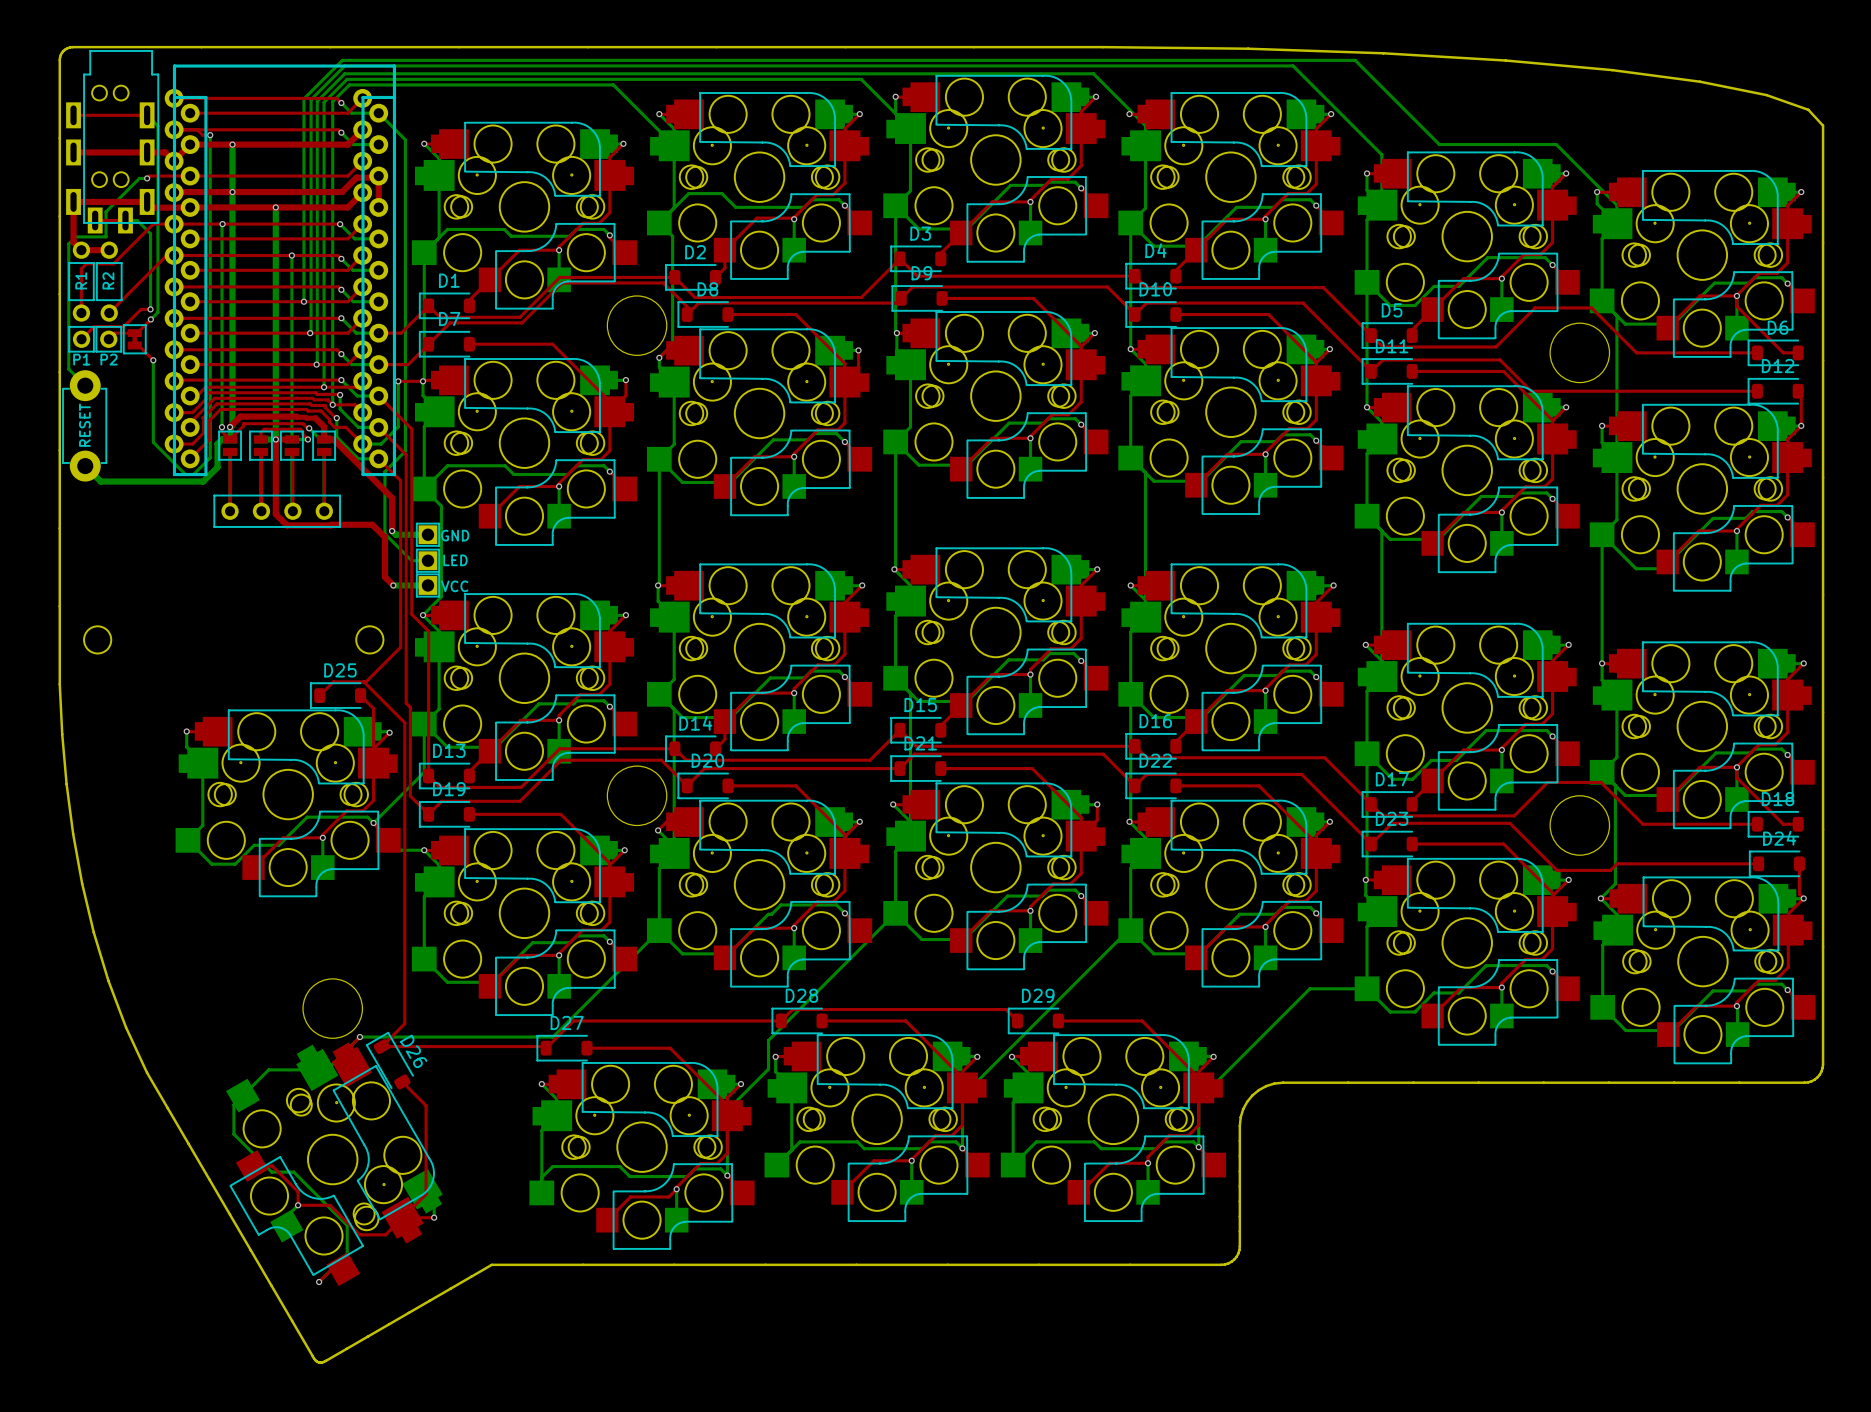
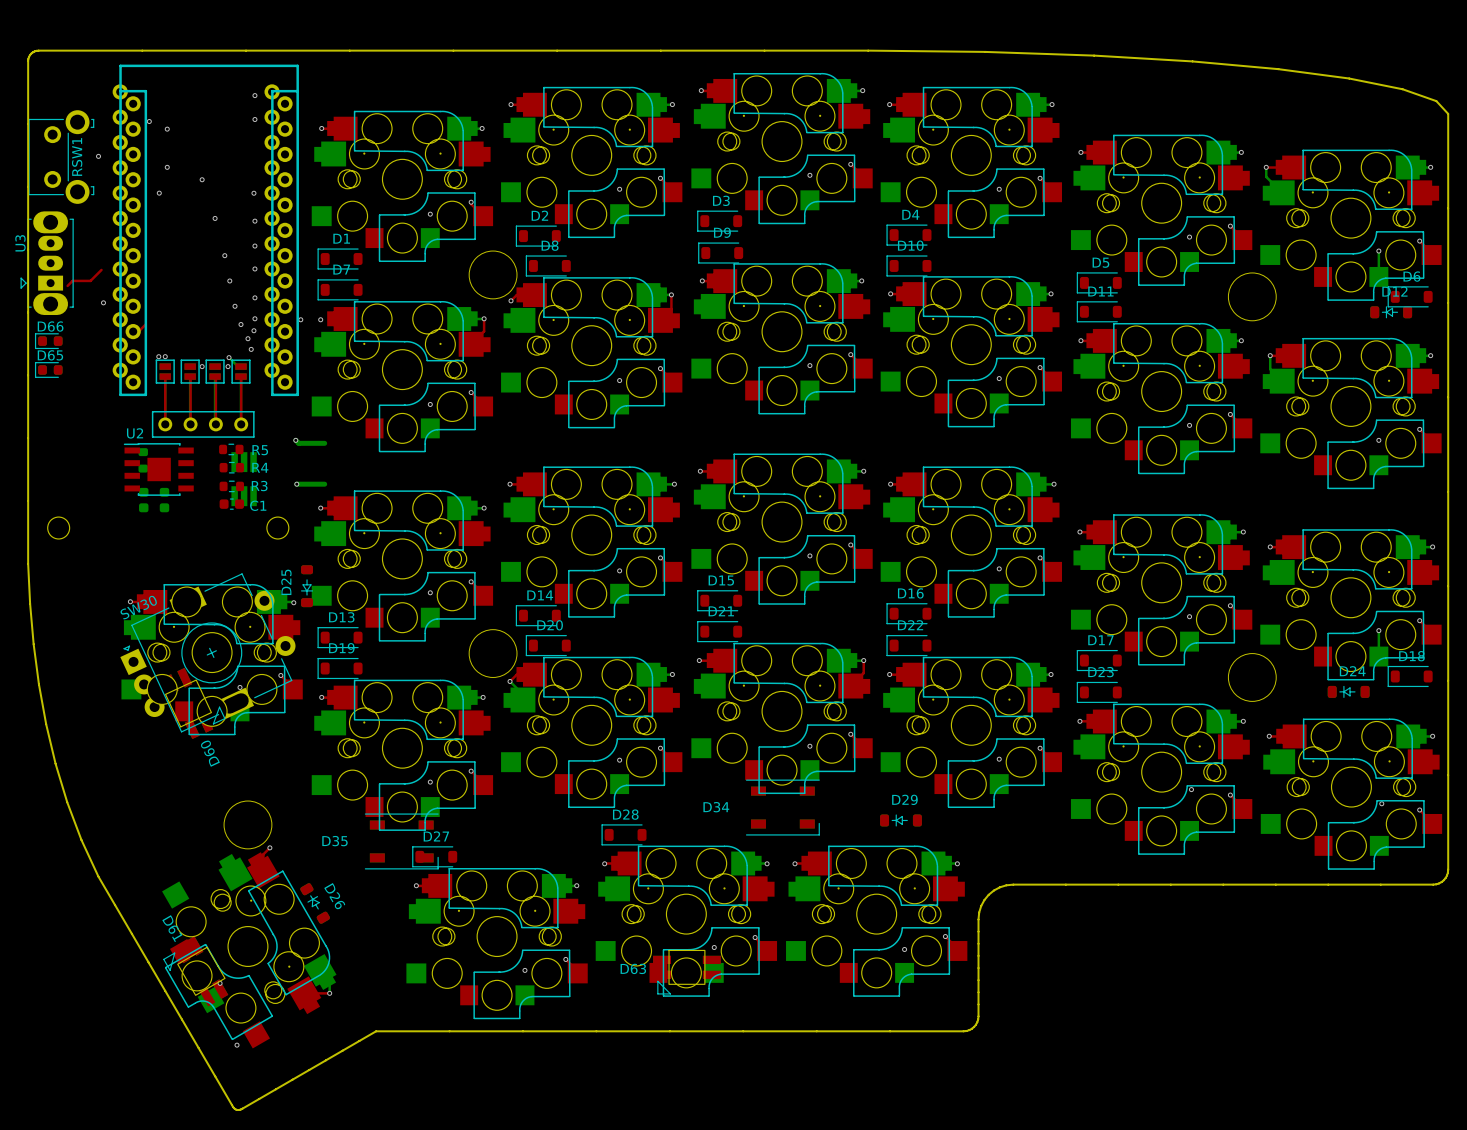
bottom track: (895, 96) (895, 113) -> none
top track: (1096, 96) (1081, 111) (1081, 165) (1068, 179) (1051, 179) (1030, 201) (992, 201) (940, 253) (940, 258) -> none
top track: (174, 98) (336, 98) (341, 102) -> none
top track: (362, 98) (347, 113) (190, 113) -> none
bottom track: (341, 102) (351, 113) (378, 113) (405, 139) (405, 451) (384, 471) (384, 533) (411, 560) (427, 560) -> none
bottom track: (659, 114) (674, 128) (674, 208) -> none
top track: (859, 114) (844, 128) (844, 183) (833, 194) (816, 194) (794, 219) (756, 218) (724, 250) (724, 268) (715, 277) -> none
top track: (1331, 114) (1316, 128) (1316, 184) (1306, 193) (1288, 193) (1265, 216) (1265, 219) (1227, 219) (1175, 270) (1175, 276) -> none
top track: (73, 115) (147, 115) -> none
bottom track: (147, 115) (157, 126) (157, 312) (150, 319) -> none
top track: (174, 129) (338, 129) (341, 132) -> none
top track: (197, 129) (202, 135) (210, 135) -> none
top track: (362, 129) (347, 144) (190, 144) (174, 161) (165, 152) (73, 152) -> none
bottom track: (341, 132) (353, 144) (378, 144) -> none
bottom track: (210, 135) (210, 457) (193, 474) (185, 474) (153, 442) (153, 360) -> none
part: (112, 141) -> none
bottom track: (424, 143) (439, 158) (439, 237) -> none
top track: (623, 143) (609, 157) (609, 212) (599, 223) (582, 223) (559, 247) (559, 250) (519, 250) (469, 300) (469, 305) -> none
bottom track: (232, 144) (232, 425) (230, 427) (230, 438) (221, 439) (217, 443) (217, 467) (203, 481) (100, 481) (85, 466) -> none
bottom track: (674, 145) (613, 84) (349, 84) (332, 101) (332, 404) -> none
top track: (362, 161) (347, 176) (149, 176) (147, 178) -> none
bottom track: (1367, 173) (1367, 190) (1381, 205) -> none
top track: (1566, 173) (1552, 187) (1552, 242) (1540, 254) (1524, 254) (1501, 278) (1463, 278) (1412, 329) (1412, 335) -> none
bottom track: (147, 178) (139, 178) (106, 211) (106, 236) (75, 236) (68, 243) (68, 369) (85, 385) -> none
RSW1: none -> (61, 157)
bottom track: (1081, 188) (1075, 182) (1048, 182) (1045, 185) (1010, 185) (967, 228) (918, 228) (895, 205) -> none
top track: (174, 192) (342, 192) (356, 177) (377, 177) (378, 176) (378, 207) -> none
top track: (362, 192) (347, 207) (152, 207) (147, 201) (73, 201) (73, 242) (81, 250) (109, 250) -> none
top track: (1801, 192) (1787, 205) (1787, 262) (1777, 273) (1758, 273) (1736, 295) (1736, 306) (1783, 352) (1798, 352) -> none
bottom track: (1030, 201) (1030, 232) -> none
bottom track: (844, 205) (839, 199) (811, 199) (804, 207) (735, 207) (721, 193) (688, 193) (659, 222) (672, 236) (672, 344) (659, 357) (659, 367) (674, 382) (674, 444) (659, 459) -> none
bottom track: (895, 205) (896, 351) (910, 364) (910, 427) (895, 441) -> none
bottom track: (895, 205) (910, 190) (910, 128) (861, 79) (347, 79) (324, 102) (324, 387) -> none
bottom track: (1316, 205) (1310, 199) (1281, 199) (1274, 207) (1236, 207) (1197, 246) (1153, 246) (1130, 222) -> none
bottom track: (1381, 205) (1381, 154) (1293, 65) (344, 65) (311, 99) (310, 333) -> none
bottom track: (1381, 205) (1367, 220) (1367, 407) (1381, 422) (1381, 438) (1367, 453) (1367, 516) (1390, 539) (1438, 539) (1481, 496) (1516, 496) (1519, 492) (1546, 492) (1552, 498) -> none
bottom track: (275, 207) (275, 439) (260, 439) -> none
bottom track: (794, 219) (794, 250) -> none
bottom track: (1265, 219) (1265, 250) -> none
top track: (95, 220) (125, 220) -> none
bottom track: (125, 220) (137, 220) (150, 233) (150, 309) -> none
bottom track: (1130, 222) (1130, 349) (1145, 364) (1145, 380) (1130, 395) (1130, 458) (1153, 481) (1201, 481) (1241, 441) (1275, 441) (1282, 434) (1310, 434) (1316, 440) -> none
bottom track: (1130, 222) (1145, 208) (1145, 125) (1093, 73) (344, 73) (317, 101) (316, 364) -> none
bottom track: (222, 224) (221, 427) -> none
top track: (340, 224) (153, 224) (113, 263) (86, 263) (81, 268) (81, 313) -> none
bottom track: (340, 224) (354, 238) (378, 238) -> none
top track: (362, 224) (347, 238) (190, 238) -> none
bottom track: (609, 235) (603, 229) (576, 229) (569, 236) (511, 236) (504, 229) (447, 229) (424, 252) (423, 395) (439, 411) (424, 426) (424, 488) -> none
bottom track: (559, 250) (559, 279) -> none
bottom track: (291, 255) (291, 439) (307, 439) -> none
top track: (362, 255) (347, 270) (190, 270) -> none
top track: (341, 258) (338, 255) (166, 255) (109, 313) -> none
bottom track: (341, 258) (352, 270) (378, 270) -> none
bottom track: (1552, 265) (1545, 257) (1487, 257) (1458, 286) (1434, 286) (1414, 305) (1390, 305) (1367, 282) -> none
bottom track: (1501, 278) (1501, 309) -> none
R1: (81, 281) -> none
R2: (109, 281) -> none
bottom track: (1787, 283) (1781, 277) (1754, 277) (1749, 283) (1714, 283) (1673, 324) (1625, 324) (1602, 300) (1602, 238) (1616, 223) (1616, 205) (1556, 144) (1439, 144) (1355, 60) (342, 60) (303, 98) (303, 301) -> none
top track: (174, 286) (338, 286) (341, 289) -> none
top track: (362, 286) (347, 301) (190, 301) -> none
bottom track: (341, 289) (353, 301) (378, 301) -> none
top track: (1736, 295) (1699, 295) (1667, 328) -> none
top track: (942, 298) (1033, 298) (1081, 346) (1081, 402) (1068, 414) (1052, 414) (1030, 438) (992, 438) (961, 469) -> none
top track: (150, 309) (141, 309) (123, 326) (94, 326) (81, 339) -> none
via: (150, 309) -> none
U3: none -> (47, 263)
top track: (728, 314) (795, 314) (844, 363) (844, 423) (838, 429) (817, 429) (794, 453) (794, 456) (754, 456) (724, 486) -> none
top track: (1175, 314) (1268, 314) (1316, 362) (1316, 419) (1307, 428) (1289, 428) (1265, 454) (1227, 454) (1196, 485) -> none
bottom track: (1616, 315) (1616, 519) (1602, 534) -> none
top track: (174, 318) (341, 318) -> none
bottom track: (341, 318) (356, 333) (378, 333) -> none
top track: (362, 318) (347, 333) (190, 333) -> none
via: (150, 319) -> none
top track: (378, 333) (401, 333) (428, 305) (440, 317) (519, 317) (559, 277) (674, 277) (694, 297) (861, 297) (899, 258) (917, 276) (1135, 276) (1146, 287) (1323, 287) (1382, 347) (1496, 347) (1535, 307) (1591, 307) (1636, 352) (1757, 352) -> none
top track: (1094, 333) (1081, 346) -> none
P1: (81, 339) -> none
P2: (108, 339) -> none
part: (134, 339) -> none
top track: (469, 344) (552, 344) (609, 401) (609, 450) (600, 459) (582, 459) (559, 483) (559, 486) (519, 486) (489, 516) -> none
top track: (134, 345) (138, 345) (153, 360) -> none
top track: (174, 349) (337, 349) (341, 354) -> none
top track: (362, 349) (347, 364) (190, 364) -> none
top track: (1329, 349) (1316, 362) -> none
bottom track: (341, 354) (351, 364) (378, 364) -> none
top track: (378, 364) (408, 364) (449, 322) (522, 322) (562, 282) (664, 282) (687, 306) (687, 314) (698, 303) (896, 303) (912, 286) (1107, 286) (1135, 314) (1146, 303) (1302, 303) (1371, 371) (1382, 359) (1500, 359) (1531, 391) (1757, 391) -> none
top track: (1412, 371) (1503, 371) (1552, 420) (1552, 478) (1544, 486) (1525, 486) (1501, 512) (1463, 512) (1432, 543) -> none
D12 footprint: [1747, 378, 1804, 405] -> [1370, 306, 1413, 319]
top track: (341, 380) (174, 381) -> none
bottom track: (341, 380) (357, 396) (378, 396) -> none
top track: (453, 380) (398, 381) -> none
top track: (362, 381) (356, 387) (205, 387) -> none
bottom track: (398, 381) (398, 426) (381, 444) (362, 444) -> none
top track: (1798, 391) (1801, 394) (1801, 425) (1787, 439) (1787, 494) (1777, 505) (1760, 505) (1736, 531) (1698, 531) (1667, 561) -> none
top track: (340, 394) (315, 392) (208, 392) (206, 398) (192, 412) (174, 412) -> none
bottom track: (340, 394) (340, 409) (358, 427) (378, 427) -> none
top track: (378, 396) (411, 429) (411, 614) (428, 631) (428, 776) (440, 787) (521, 787) (559, 748) (674, 748) (686, 760) (869, 760) (899, 730) (916, 746) (1135, 746) (1146, 757) (1324, 757) (1382, 815) (1514, 815) (1547, 782) (1601, 782) (1642, 824) (1757, 824) -> none
D66: none -> (48, 341)
top track: (1566, 407) (1552, 420) -> none
top track: (362, 412) (354, 404) (332, 404) (328, 399) (312, 398) (214, 398) (190, 422) (190, 427) -> none
top track: (336, 418) (325, 405) (217, 403) (202, 418) (203, 432) (192, 444) (174, 444) -> none
bottom track: (336, 418) (336, 437) (358, 458) (378, 458) -> none
bottom track: (1081, 424) (1075, 418) (1048, 418) (1043, 423) (1009, 423) (967, 465) (918, 465) (895, 441) -> none
part: (84, 425) -> none
top track: (221, 427) (221, 431) (230, 439) (243, 423) (302, 423) (309, 428) -> none
top track: (230, 427) (240, 416) (315, 418) (324, 426) (324, 439) (333, 439) (392, 498) (392, 531) -> none
top track: (378, 427) (406, 454) (406, 703) (410, 707) (410, 796) (428, 814) (441, 801) (520, 801) (561, 760) (661, 760) (687, 785) (704, 768) (899, 768) (914, 754) (1103, 754) (1135, 785) (1146, 774) (1301, 774) (1371, 844) (1392, 823) (1509, 823) (1557, 870) (1610, 870) (1617, 863) (1758, 863) -> none
bottom track: (1030, 438) (1030, 469) -> none
top track: (260, 439) (260, 432) (264, 429) (300, 429) (307, 439) -> none
top track: (291, 439) (275, 439) (275, 514) (287, 525) (372, 524) (384, 537) (384, 577) (393, 585) -> none
bottom track: (844, 441) (836, 433) (814, 433) (807, 439) (773, 439) (730, 482) (682, 482) (659, 459) -> none
bottom track: (895, 441) (894, 569) (910, 585) (910, 601) (895, 615) (895, 678) (918, 701) (967, 701) (1008, 659) (1043, 659) (1049, 653) (1073, 653) (1081, 660) -> none
D65: none -> (48, 369)
top track: (362, 444) (345, 427) (334, 427) (320, 411) (220, 409) (209, 420) (209, 439) (190, 458) -> none
bottom track: (1265, 454) (1265, 485) -> none
bottom track: (794, 456) (794, 486) -> none
top track: (378, 458) (400, 480) (400, 647) (366, 681) (333, 681) (319, 695) -> none
bottom track: (659, 459) (658, 601) (674, 617) (674, 679) (659, 694) (682, 717) (730, 717) (770, 677) (804, 677) (811, 671) (839, 671) (844, 677) -> none
bottom track: (609, 471) (603, 465) (576, 465) (568, 474) (513, 474) (505, 465) (447, 465) (424, 488) -> none
bottom track: (1145, 472) (1145, 617) (1130, 631) (1129, 821) (1145, 837) (1145, 853) (1130, 868) (1130, 930) -> none
bottom track: (559, 486) (559, 516) -> none
bottom track: (424, 488) (441, 506) (441, 596) (423, 615) (439, 631) (439, 709) (424, 724) -> none
bottom track: (1501, 512) (1501, 543) -> none
bottom track: (1787, 517) (1781, 511) (1752, 511) (1745, 518) (1713, 518) (1662, 568) (1636, 568) (1602, 534) -> none
bottom track: (1381, 531) (1381, 676) (1367, 691) (1365, 879) (1365, 895) (1381, 911) (1367, 926) (1367, 988) -> none
bottom track: (1736, 531) (1736, 561) -> none
bottom track: (1602, 534) (1602, 680) (1616, 695) (1616, 757) (1602, 772) (1625, 795) (1673, 795) (1716, 752) (1750, 752) (1754, 749) (1781, 749) (1787, 754) -> none
R5: none -> (231, 449)
part: none -> (143, 460)
part: (427, 560) -> none
R4: none -> (231, 467)
U2: none -> (158, 469)
top track: (1097, 569) (1081, 585) (1081, 638) (1070, 648) (1051, 648) (1030, 669) (1030, 674) (992, 674) (940, 725) (940, 730) -> none
part: none -> (244, 479)
top track: (862, 585) (844, 602) (844, 654) (834, 664) (817, 664) (794, 688) (794, 693) (753, 693) (724, 721) (724, 739) (715, 748) -> none
bottom track: (1130, 585) (1145, 600) -> none
top track: (1333, 585) (1316, 602) (1316, 654) (1305, 664) (1289, 664) (1265, 690) (1227, 690) (1175, 741) (1175, 746) -> none
R3: none -> (231, 486)
part: none -> (143, 500)
part: none -> (164, 500)
C1: none -> (231, 504)
top track: (625, 615) (609, 631) (609, 684) (599, 694) (579, 694) (559, 715) (559, 720) (520, 720) (469, 771) (469, 776) -> none
bottom track: (1365, 644) (1381, 660) -> none
top track: (1568, 644) (1552, 660) (1552, 713) (1542, 724) (1525, 724) (1501, 750) (1463, 750) (1412, 801) (1412, 804) -> none
top track: (1803, 663) (1787, 679) (1787, 732) (1775, 744) (1758, 744) (1736, 766) (1736, 777) (1783, 824) (1798, 824) -> none
D25 name position: D25 (340, 670) -> D25 (286, 582)
bottom track: (1030, 674) (1030, 705) -> none
bottom track: (1316, 677) (1310, 671) (1282, 671) (1278, 675) (1244, 675) (1202, 717) (1153, 717) (1130, 694) -> none
top track: (363, 681) (404, 722) (404, 1023) (381, 1046) (544, 1046) (546, 1048) (573, 1020) (781, 1020) (792, 1009) (1006, 1009) (1017, 1020) -> none
D25 footprint: [310, 682, 367, 709] -> [301, 565, 314, 608]
bottom track: (1265, 690) (1265, 721) -> none
bottom track: (794, 693) (794, 721) -> none
bottom track: (910, 693) (910, 836) (895, 850) (895, 913) -> none
top track: (360, 695) (373, 708) (373, 800) (363, 810) (346, 810) (322, 834) (322, 837) (283, 837) (253, 867) -> none
bottom track: (609, 706) (603, 700) (576, 700) (573, 703) (539, 703) (495, 747) (447, 747) (424, 724) -> none
bottom track: (674, 709) (674, 853) (659, 868) (659, 930) -> none
bottom track: (559, 720) (559, 751) -> none
bottom track: (424, 724) (424, 772) (373, 823) -> none
bottom track: (186, 731) (186, 747) (202, 763) (202, 825) (187, 840) (211, 864) (235, 864) (254, 845) (279, 845) (307, 817) (367, 817) (400, 850) (424, 850) (439, 865) (439, 881) (424, 896) (424, 959) (447, 982) (493, 982) (532, 942) (569, 942) (576, 935) (603, 935) (609, 941) -> none
top track: (389, 732) (373, 748) -> none
bottom track: (1552, 736) (1546, 730) (1486, 730) (1456, 760) (1431, 760) (1412, 779) (1392, 779) (1367, 753) -> none
bottom track: (1501, 750) (1501, 780) -> none
top track: (1736, 767) (1699, 767) (1667, 799) -> none
top track: (940, 768) (1032, 768) (1081, 817) (1081, 873) (1070, 883) (1053, 883) (1030, 906) (1030, 910) (990, 910) (961, 940) -> none
top track: (728, 785) (795, 785) (844, 834) (844, 890) (833, 901) (817, 901) (794, 925) (794, 928) (754, 928) (724, 957) -> none
top track: (1175, 785) (1259, 785) (1316, 843) -> none
bottom track: (1615, 785) (1615, 883) (1600, 898) (1617, 915) (1617, 930) (1602, 945) (1602, 1007) (1625, 1030) (1673, 1030) (1713, 990) (1748, 990) (1755, 984) (1781, 984) (1787, 990) -> none
SW30: none -> (207, 652)
bottom track: (893, 804) (910, 821) -> none
top track: (469, 814) (560, 814) (609, 863) (609, 922) (601, 930) (582, 930) (559, 955) (520, 955) (489, 986) -> none
top track: (859, 821) (844, 836) -> none
top track: (1329, 821) (1316, 835) (1316, 890) (1305, 901) (1289, 901) (1265, 926) (1227, 926) (1196, 957) -> none
bottom track: (322, 837) (322, 867) -> none
top track: (1412, 844) (1503, 844) (1552, 893) (1552, 948) (1542, 959) (1525, 959) (1501, 983) (1501, 987) (1461, 987) (1432, 1016) -> none
top track: (624, 850) (609, 865) -> none
D24 footprint: [1749, 850, 1805, 877] -> [1327, 685, 1370, 698]
D60: none -> (194, 703)
top track: (1799, 863) (1799, 894) (1803, 898) (1788, 913) (1788, 967) (1775, 980) (1758, 980) (1736, 1002) (1736, 1006) (1696, 1006) (1668, 1034) -> none
top track: (1568, 879) (1552, 896) -> none
bottom track: (1081, 896) (1075, 890) (1048, 890) (1042, 896) (1007, 896) (964, 939) (921, 939) (895, 913) -> none
bottom track: (1030, 910) (1030, 940) -> none
bottom track: (844, 913) (836, 904) (780, 904) (771, 914) (768, 914) (728, 953) (682, 953) (659, 930) -> none
bottom track: (895, 913) (768, 1040) (768, 1069) (727, 1110) (727, 1175) (720, 1168) (695, 1168) (687, 1176) (629, 1176) (619, 1166) (552, 1166) (541, 1177) -> none
bottom track: (1316, 913) (1310, 907) (1282, 907) (1275, 914) (1239, 914) (1200, 953) (1153, 953) (1130, 930) -> none
bottom track: (1265, 926) (1265, 957) -> none
bottom track: (794, 928) (794, 957) -> none
bottom track: (659, 930) (552, 1037) (359, 1037) (327, 1069) (268, 1069) (233, 1104) (233, 1134) (271, 1172) (293, 1172) (347, 1225) (347, 1253) (319, 1282) -> none
bottom track: (1130, 930) (1128, 930) (962, 1096) (962, 1148) (955, 1141) (929, 1141) (922, 1148) (864, 1148) (857, 1141) (800, 1141) (776, 1165) -> none
bottom track: (559, 955) (559, 986) -> none
bottom track: (1552, 971) (1546, 965) (1486, 965) (1458, 992) (1434, 992) (1414, 1011) (1390, 1011) (1367, 988) -> none
D34: none -> (782, 807)
bottom track: (1501, 987) (1501, 1016) -> none
via position: (1501, 987) -> (1191, 789)
bottom track: (1367, 988) (1309, 988) (1198, 1099) (1198, 1147) (1193, 1141) (1163, 1141) (1156, 1148) (1101, 1148) (1094, 1141) (1036, 1141) (1013, 1165) (1013, 1102) (1028, 1087) (1028, 1072) (1011, 1056) -> none
bottom track: (1736, 1006) (1737, 1034) -> none
via position: (1736, 1006) -> (1381, 803)
D29 footprint: [1007, 1007, 1064, 1035] -> [880, 814, 922, 827]
top track: (822, 1020) (905, 1020) (962, 1077) -> none
top track: (1058, 1020) (1142, 1020) (1198, 1077) -> none
D35: none -> (401, 841)
D26 footprint: [366, 1032, 414, 1090] -> [300, 883, 330, 924]
top track: (586, 1048) (670, 1048) (727, 1105) -> none
bottom track: (775, 1056) (775, 1071) (791, 1087) (791, 1150) -> none
top track: (977, 1056) (962, 1071) (962, 1125) (951, 1135) (935, 1135) (911, 1160) (873, 1160) (842, 1192) -> none
top track: (1213, 1056) (1198, 1071) (1198, 1125) (1188, 1135) (1169, 1135) (1148, 1156) (1148, 1163) (1109, 1163) (1078, 1192) -> none
top track: (402, 1081) (426, 1105) (426, 1194) (385, 1234) (359, 1234) (330, 1205) (298, 1205) (298, 1191) (272, 1166) (252, 1166) -> none
bottom track: (541, 1084) (556, 1098) (556, 1115) (541, 1130) (541, 1192) -> none
top track: (741, 1084) (727, 1097) (727, 1153) (717, 1163) (700, 1163) (668, 1196) (630, 1196) (607, 1220) -> none
bottom track: (911, 1160) (911, 1192) -> none
bottom track: (1148, 1163) (1148, 1192) -> none
bottom track: (676, 1189) (676, 1220) -> none
D61: none -> (195, 971)
D63: none -> (686, 972)
top track: (343, 1269) (331, 1269) (319, 1282) -> none

